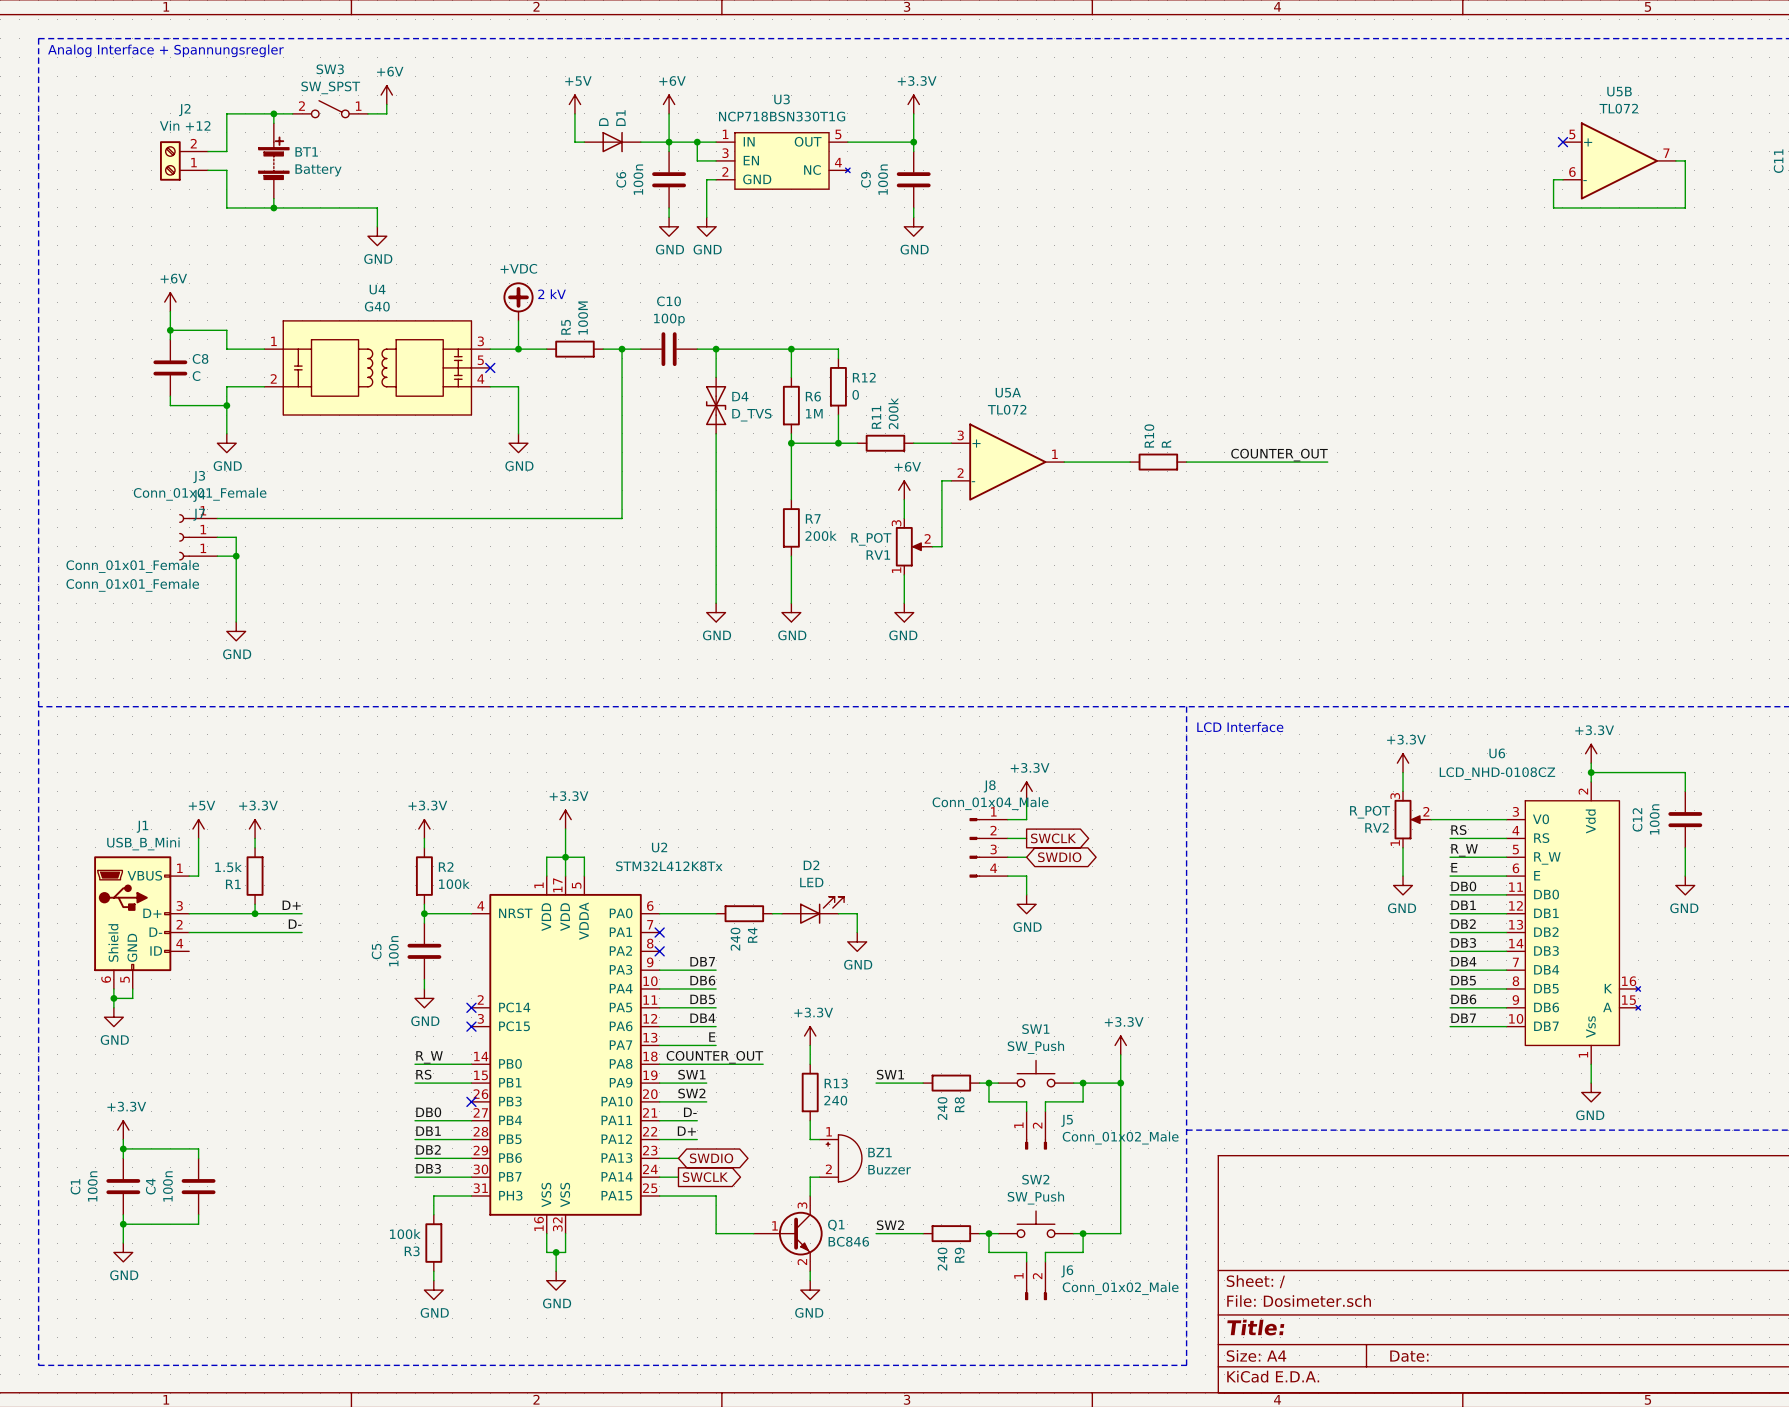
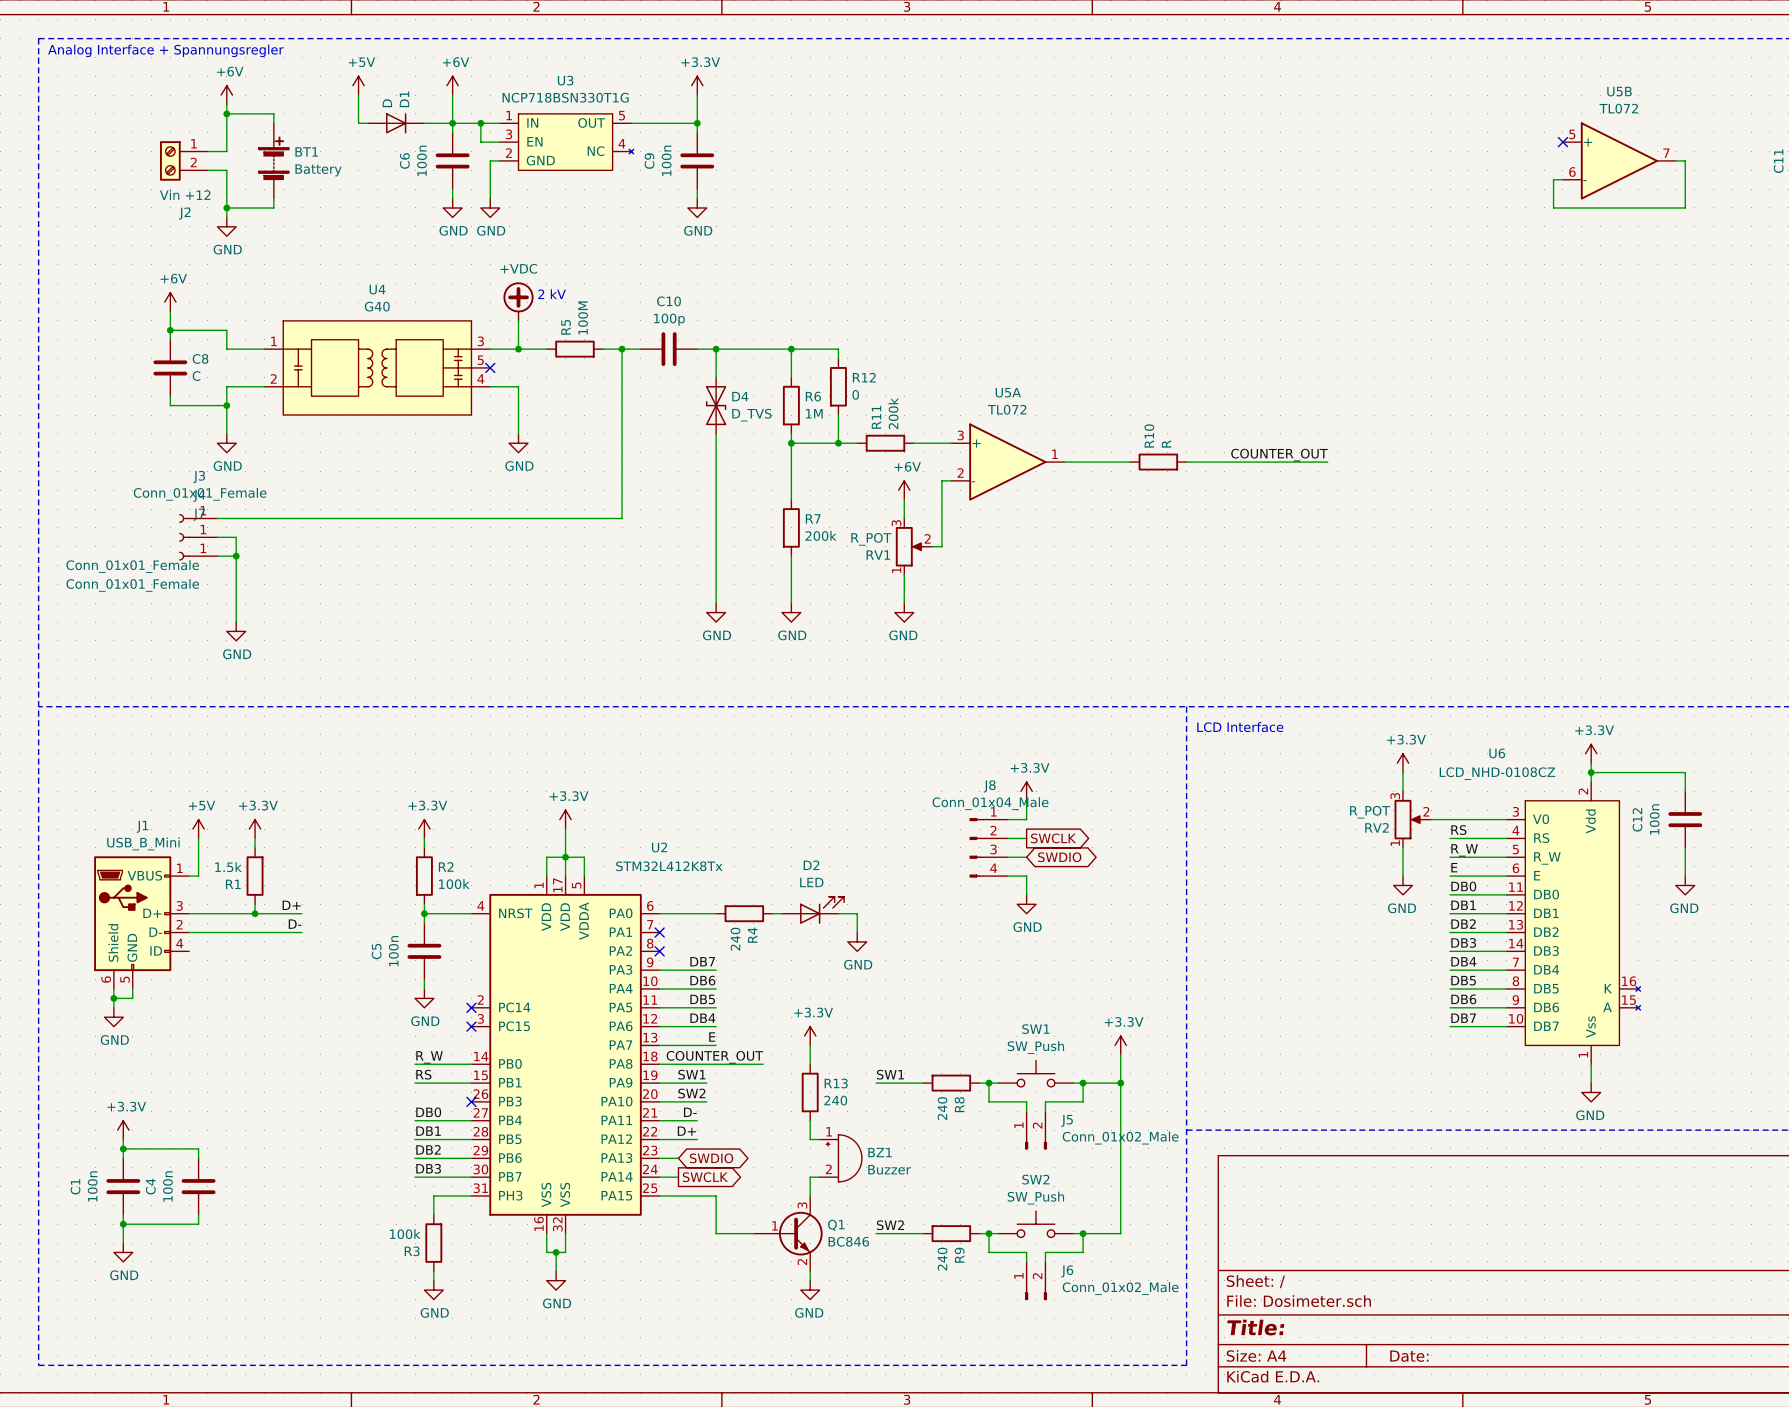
power symbol: none -> +5V (358, 85)
power symbol: none -> +3.3V (697, 85)
power symbol: none -> +6V (226, 95)
wire: none -> (358, 95) (358, 123) (367, 123)
power symbol position: +6V (386, 95) -> +6V (452, 85)
wire: none -> (452, 95) (452, 132)
wire: none -> (226, 104) (226, 113)
wire: (386, 104) (386, 113) (367, 113) -> none
power symbol: +5V (574, 104) -> none
power symbol: +6V (669, 104) -> none
power symbol: +3.3V (913, 104) -> none
SW3: SW_SPST (330, 109) -> none
junction: none -> (226, 113)
wire: (273, 113) (292, 113) -> none
junction: (273, 113) -> none
wire: (669, 113) (669, 151) -> (697, 95) (697, 132)
wire: (913, 113) (913, 151) -> none
wire: none -> (424, 123) (499, 123)
junction: none -> (452, 123)
wire: none -> (480, 123) (480, 142) (499, 142)
junction: none -> (480, 123)
wire: none -> (631, 123) (697, 123)
junction: none -> (697, 123)
D1 position: (612, 142) -> (396, 123)
wire: (640, 142) (716, 142) -> none
junction: (669, 142) -> none
wire: (697, 142) (697, 160) (716, 160) -> none
junction: (697, 142) -> none
wire: (847, 142) (913, 142) -> none
junction: (913, 142) -> none
J2 flip: as is (170, 160) -> up-down (170, 160)
wire: none -> (499, 160) (490, 160) (490, 198)
U3 position: (783, 160) -> (566, 142)
C6 position: (669, 179) -> (452, 160)
wire: (716, 179) (706, 179) (706, 217) -> none
C9 position: (913, 179) -> (697, 160)
wire: none -> (452, 189) (452, 198)
wire: none -> (226, 207) (226, 217)
junction: none -> (226, 207)
wire: (273, 207) (377, 207) (377, 226) -> none
junction: (273, 207) -> none
power symbol: none -> GND (452, 207)
power symbol: none -> GND (490, 207)
wire: (669, 207) (669, 217) -> (697, 189) (697, 198)
power symbol: none -> GND (697, 207)
wire: (913, 207) (913, 217) -> none
power symbol: none -> GND (226, 226)
power symbol: GND (669, 226) -> none
power symbol: GND (706, 226) -> none
power symbol: GND (913, 226) -> none
power symbol: GND (377, 236) -> none

